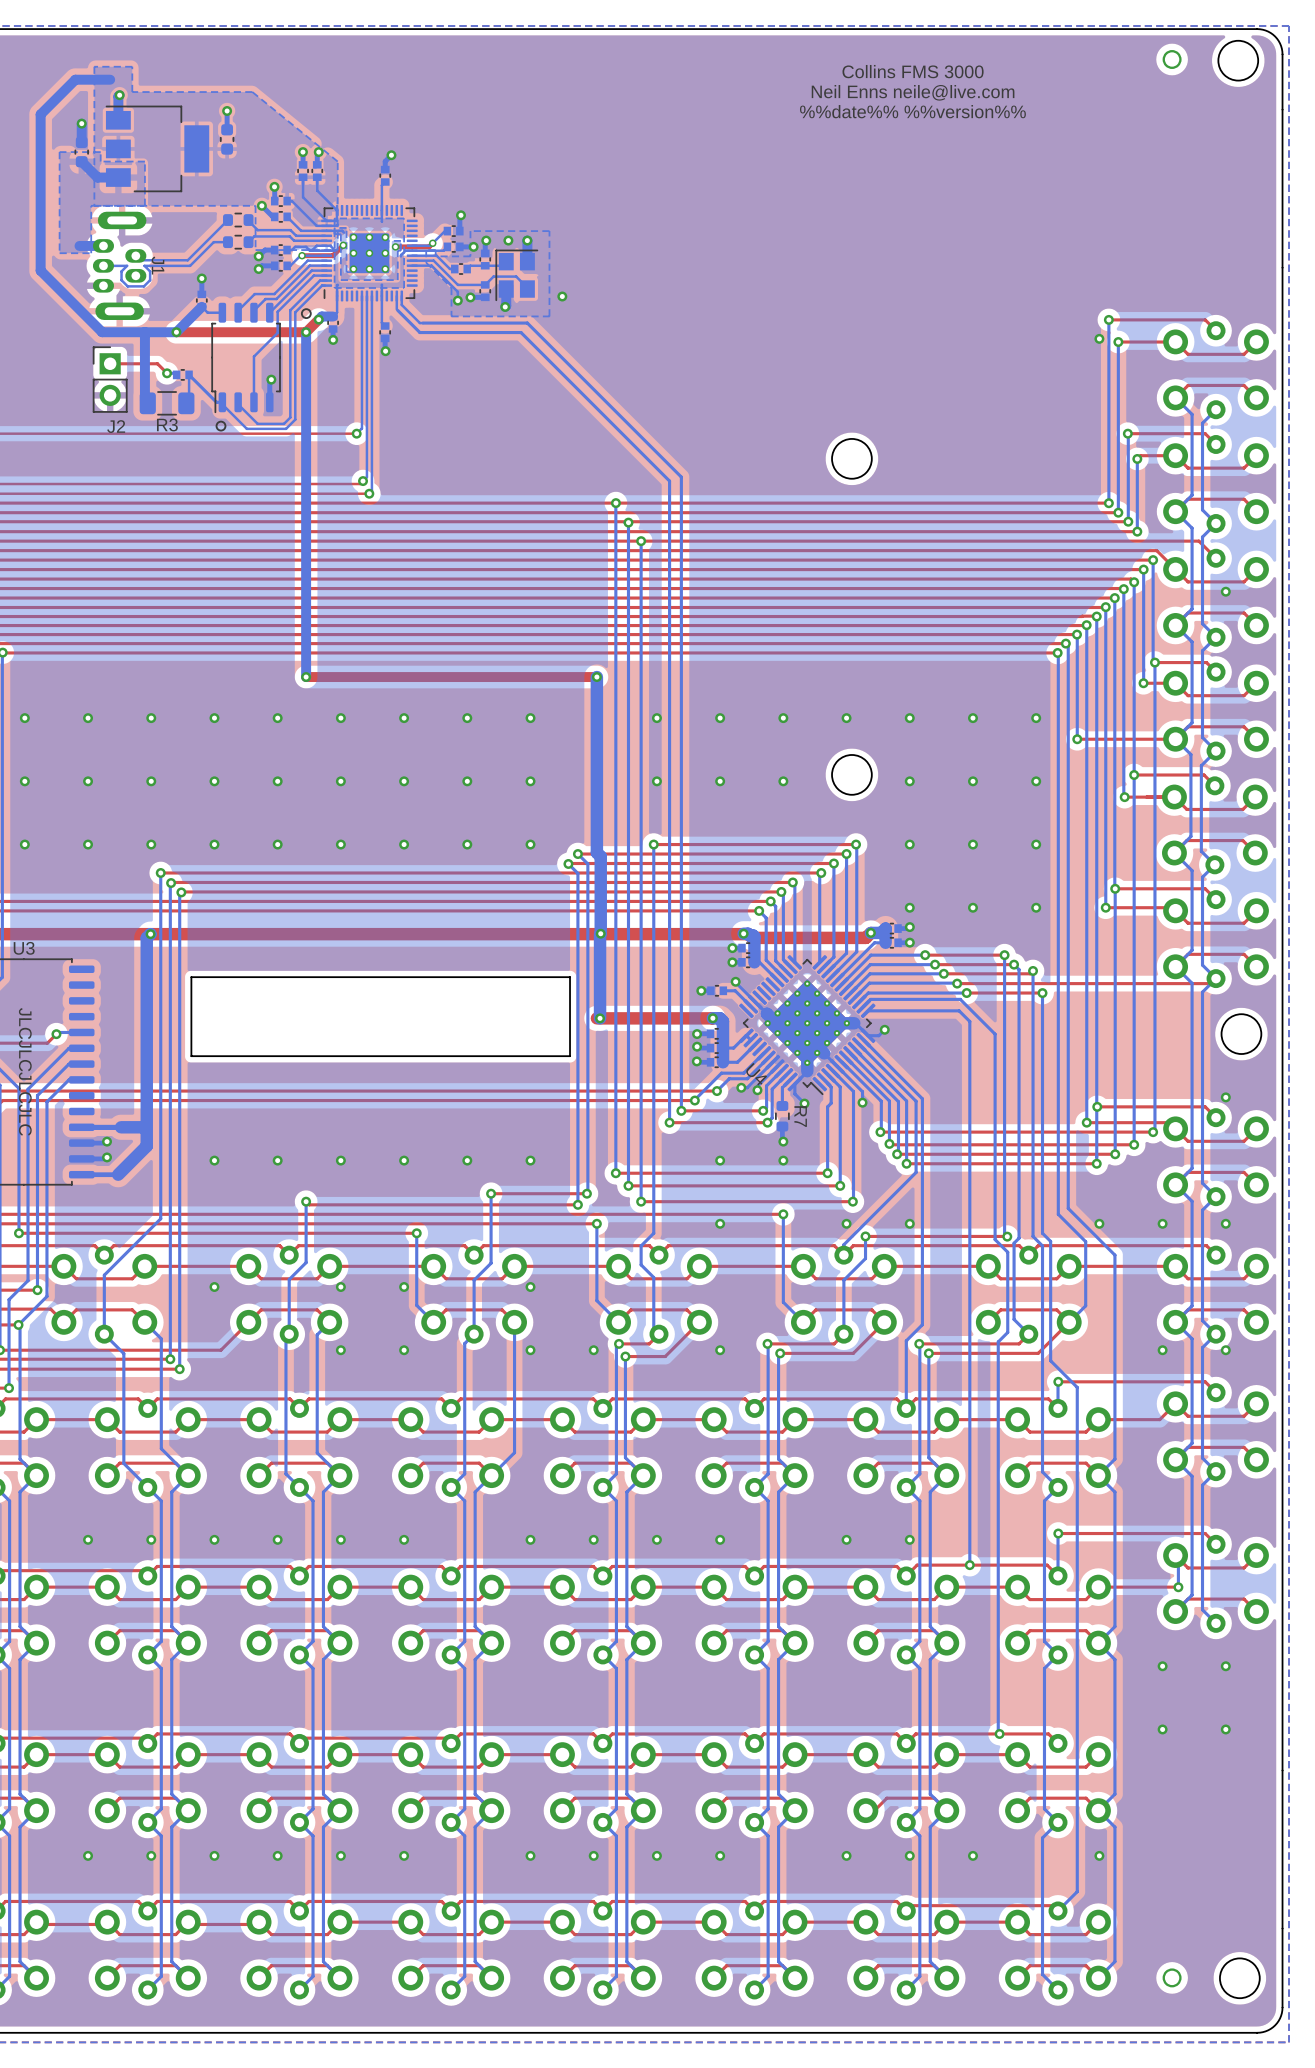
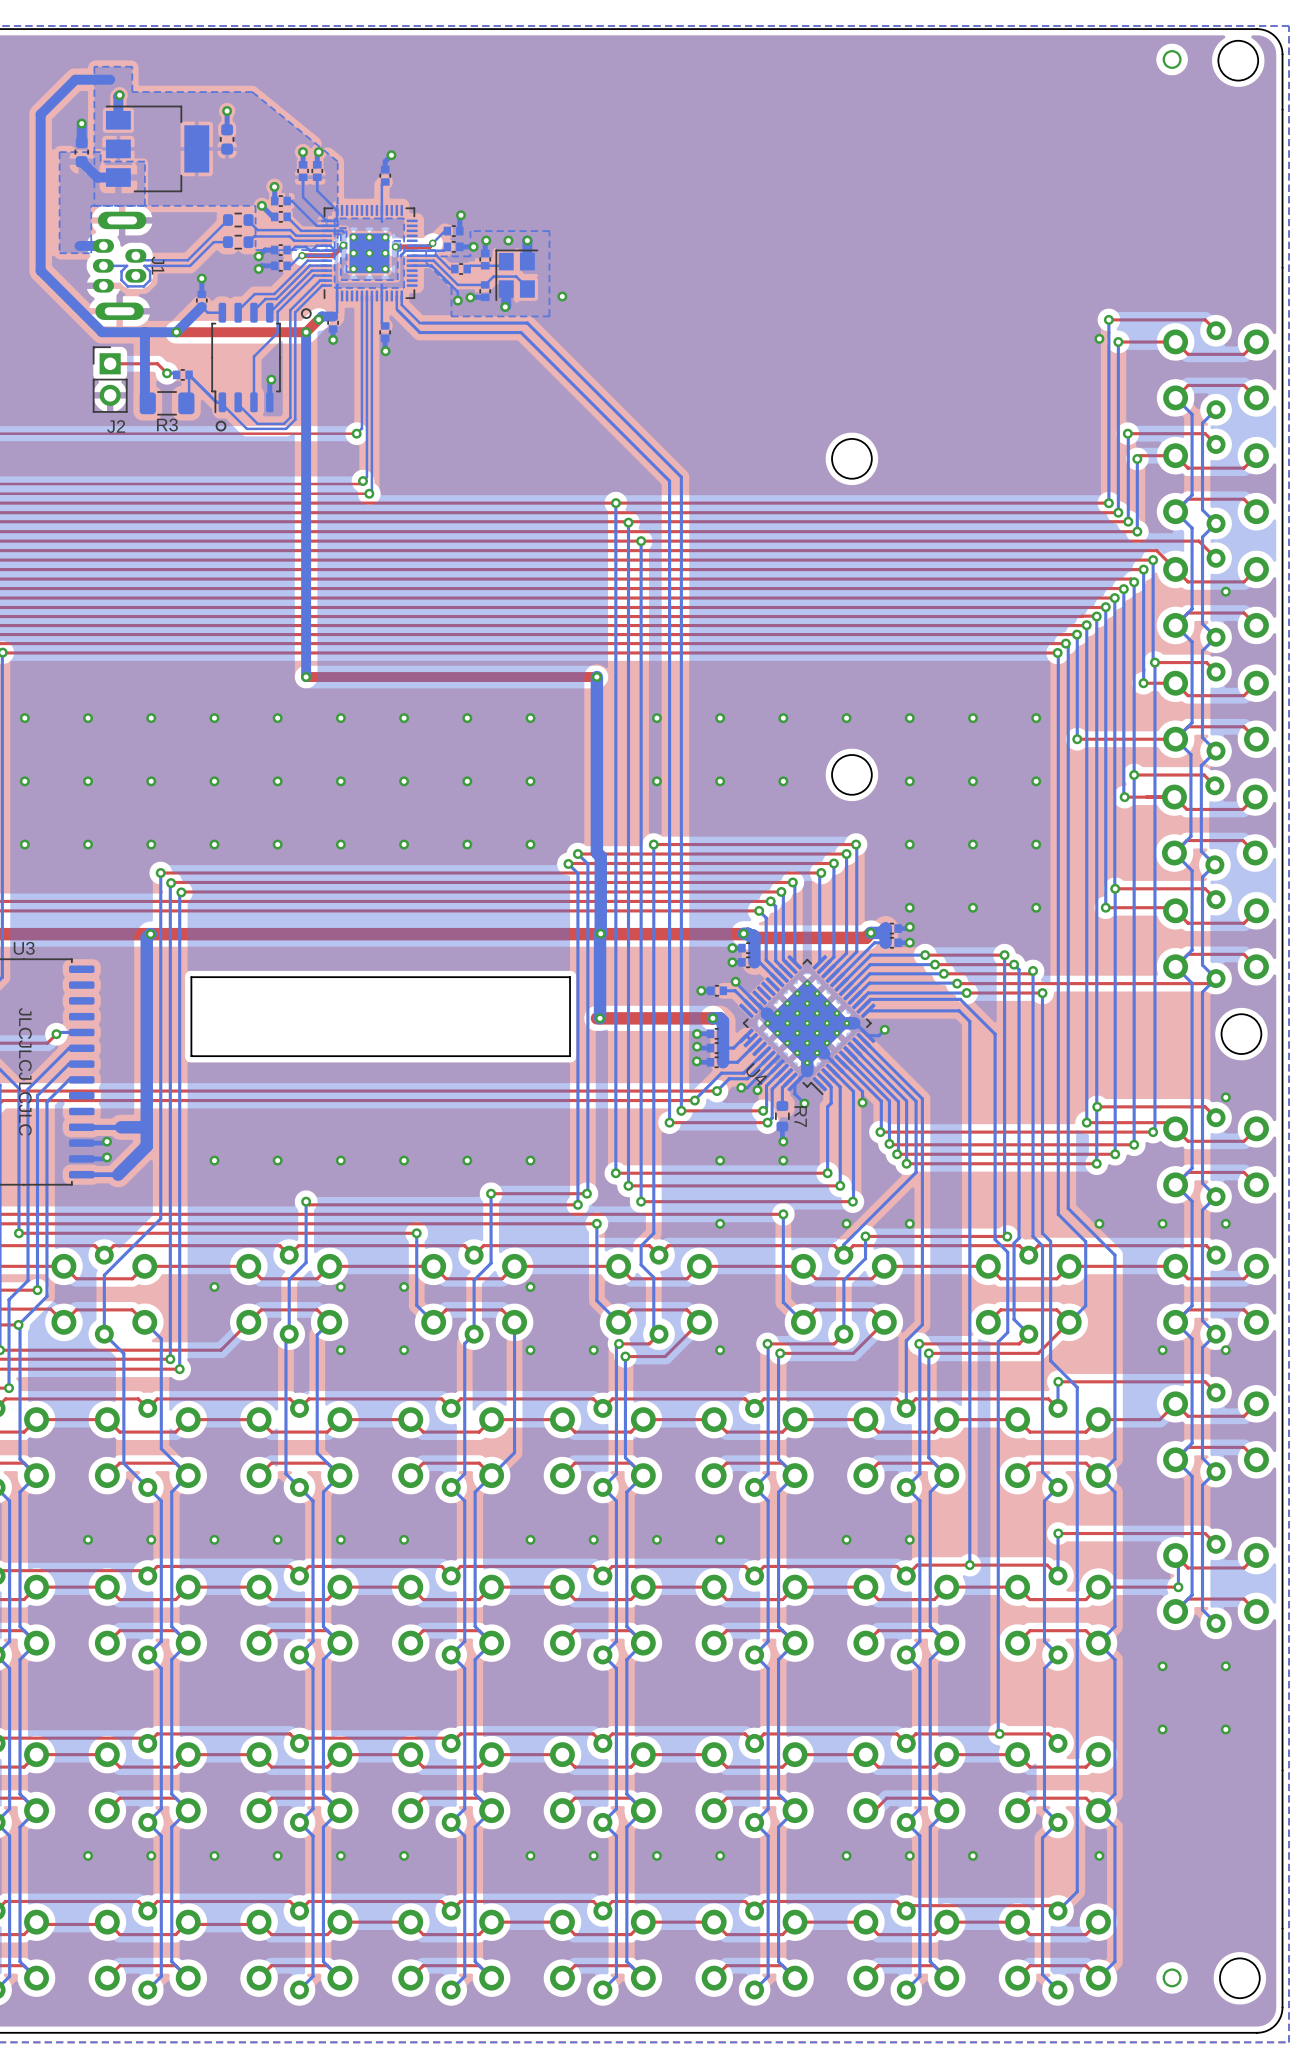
text: Collins FMS 3000 (913, 71) -> none
text: Neil Enns neile@live.com (913, 92) -> none
text: %%date%% %%version%% (912, 111) -> none

